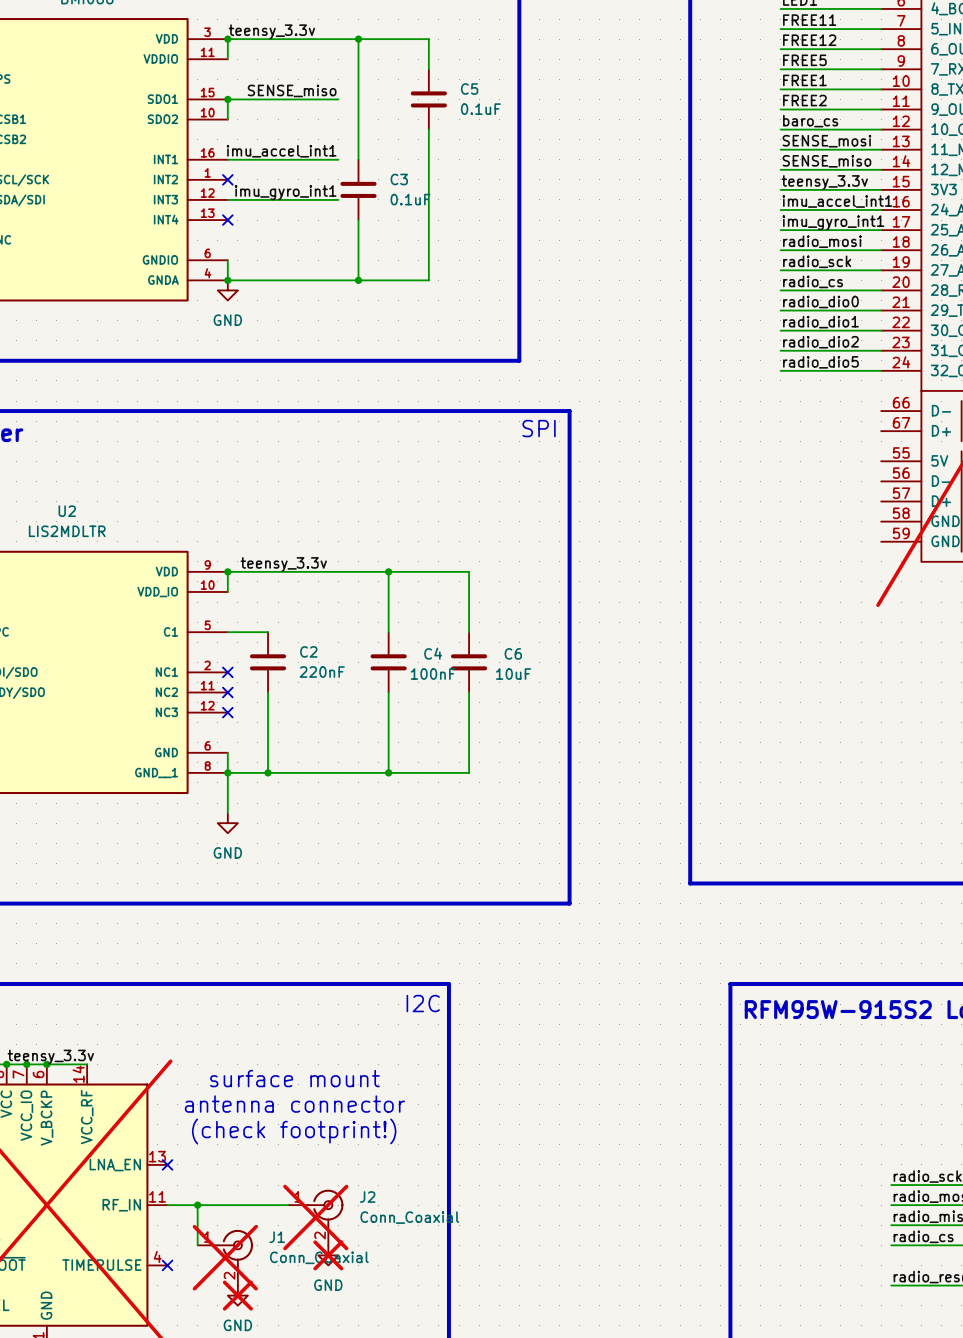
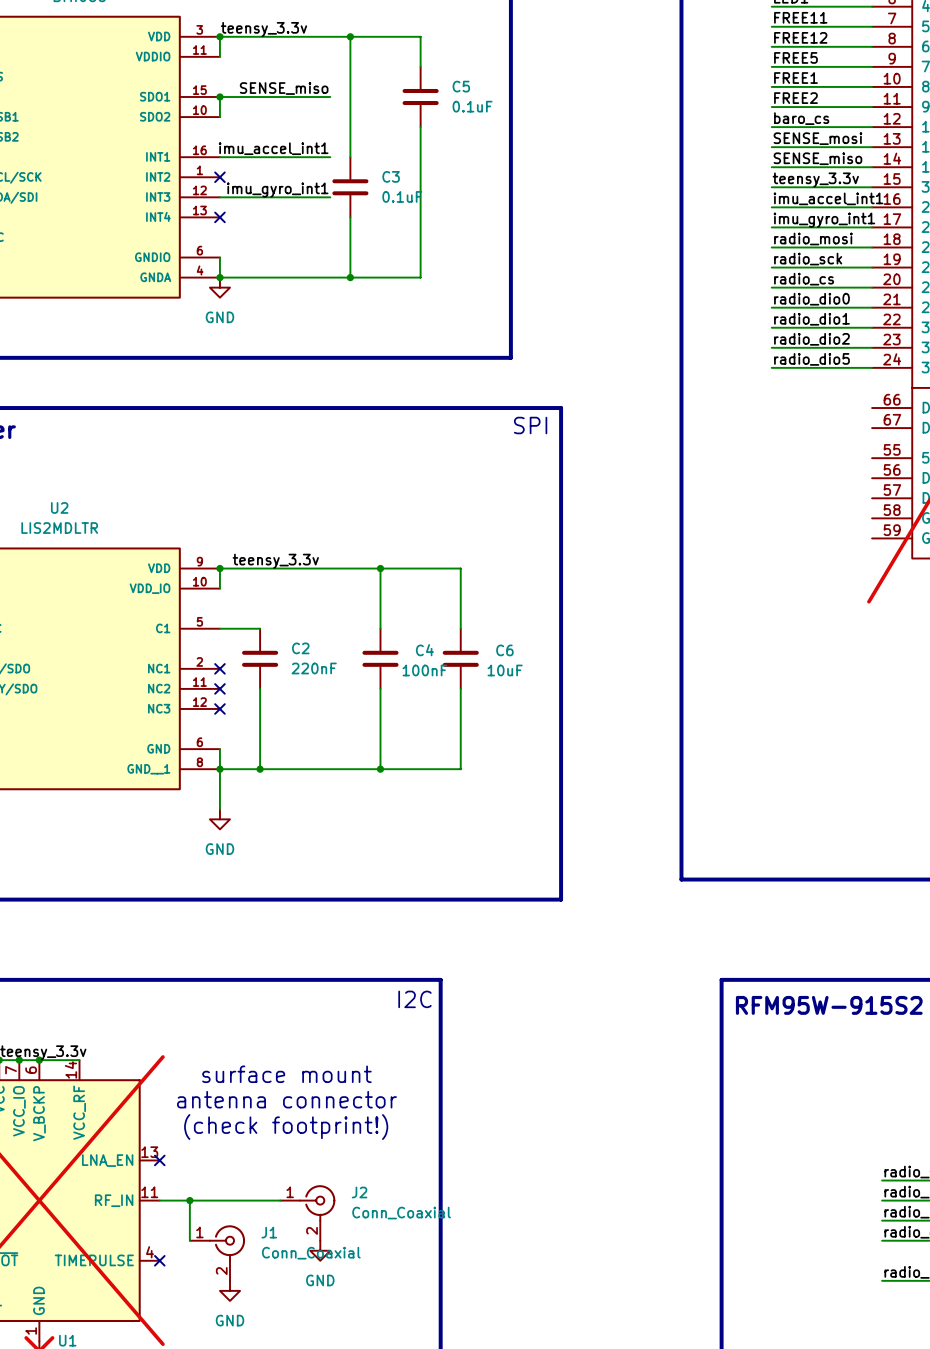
J2 do-not-place cross: (315, 1217) -> none
power symbol do-not-place cross: (328, 1255) -> none
J1 do-not-place cross: (225, 1257) -> none
power symbol do-not-place cross: (237, 1295) -> none

